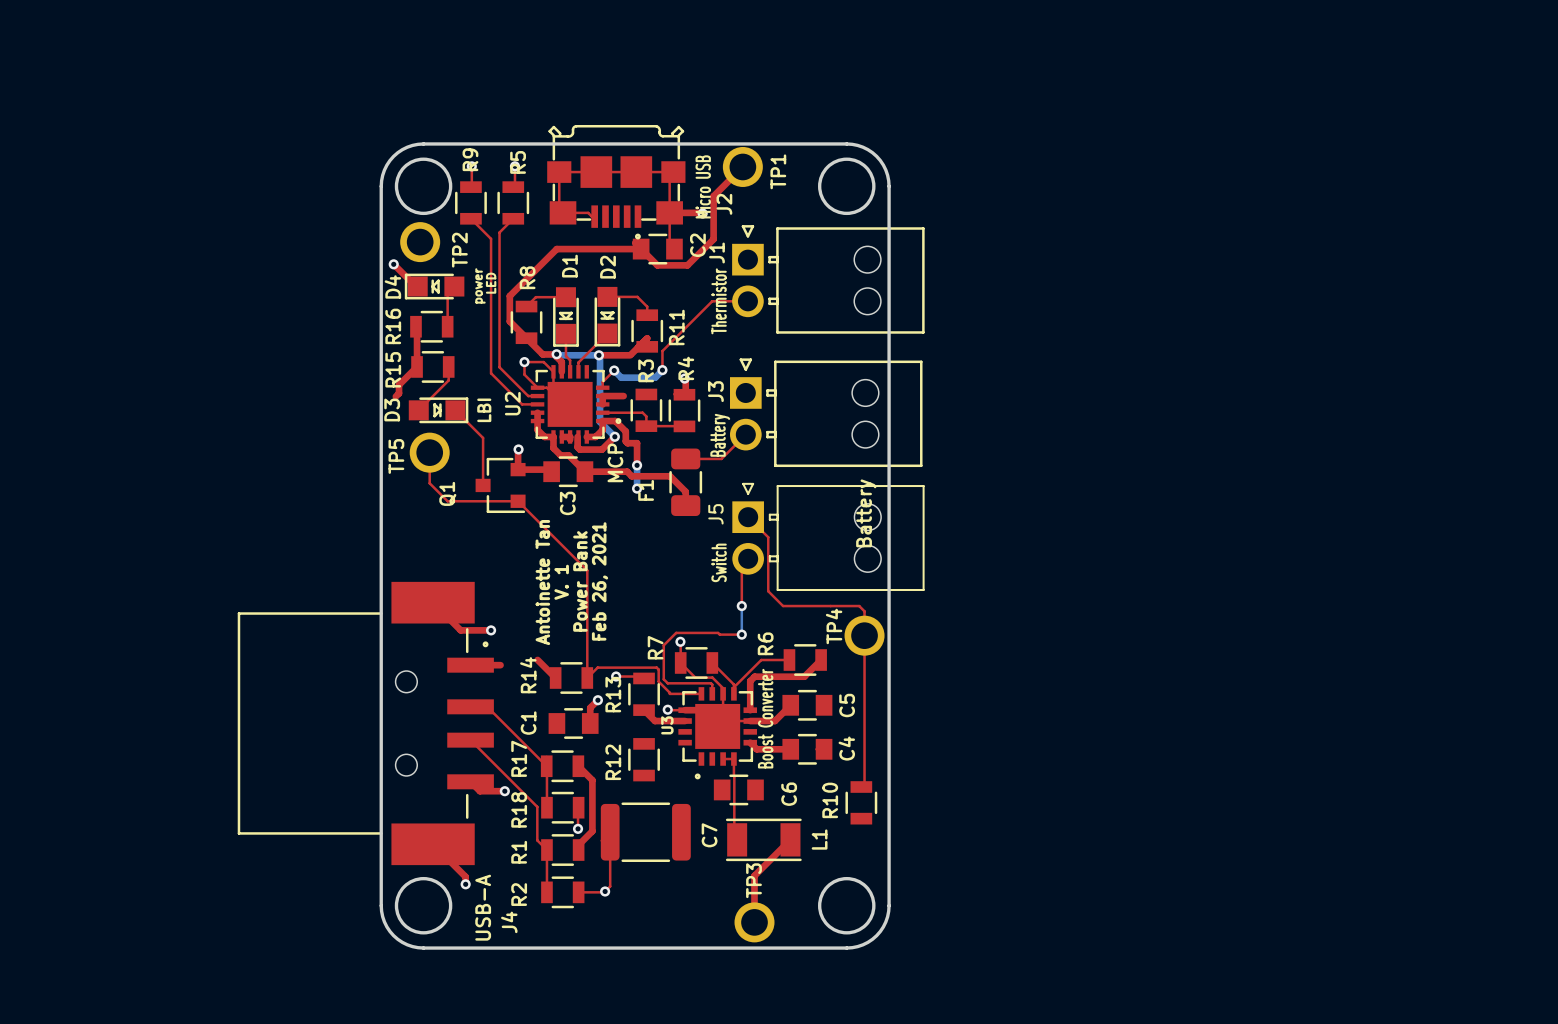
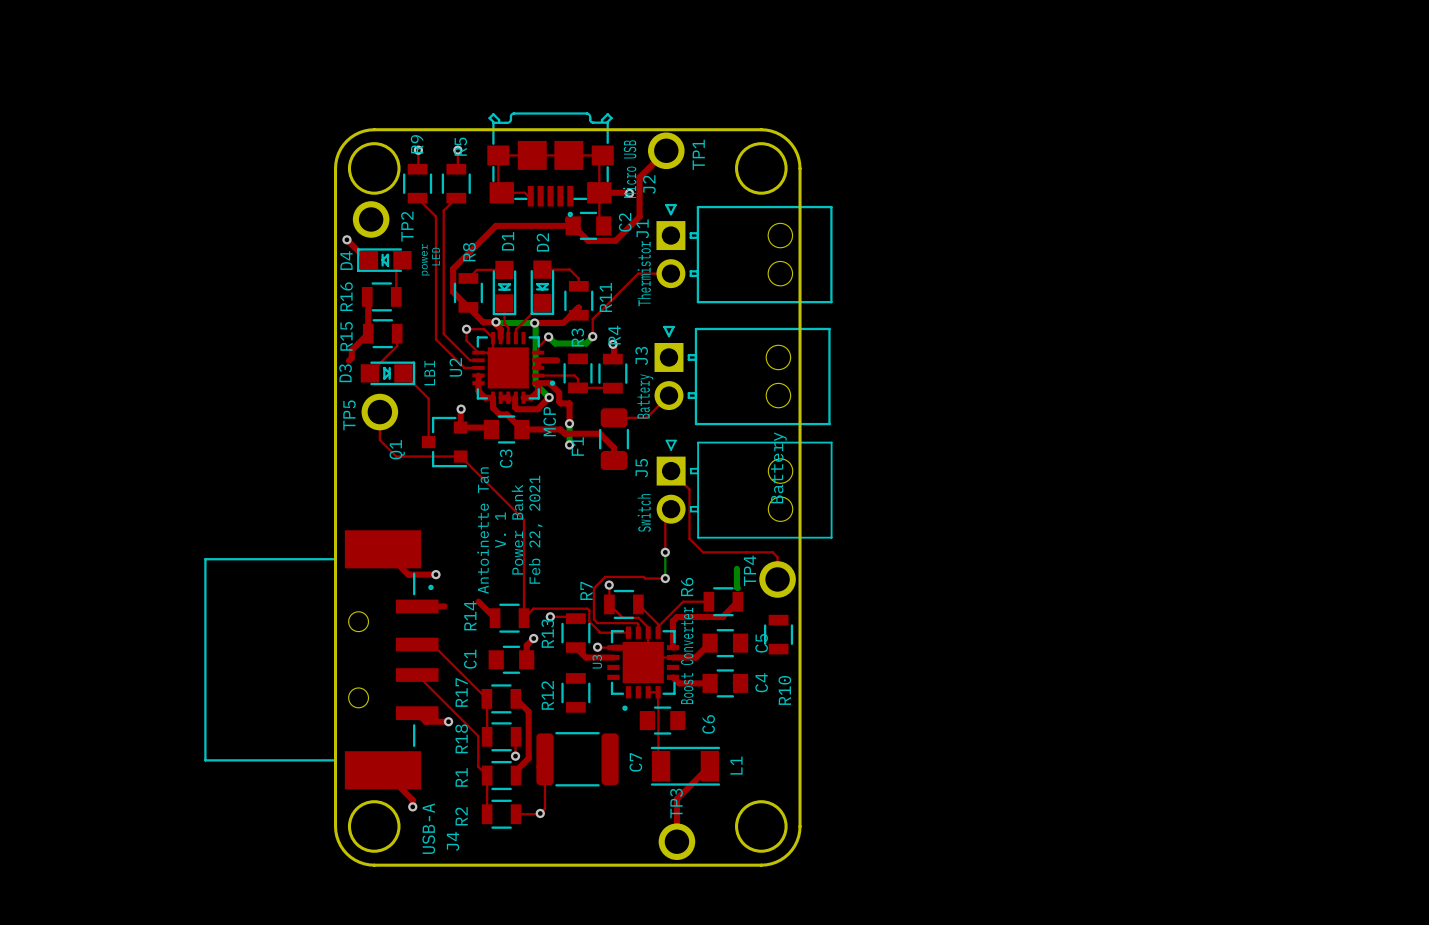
text: Feb 26, 2021 (600, 581) -> Feb 22, 2021 (535, 529)
bottom track: none -> (736, 568) (737, 588)
top track: (864, 635) (864, 783) (861, 787) -> none
R10 name position: R10 (830, 800) -> R10 (784, 690)
R10 position: (861, 802) -> (778, 634)

